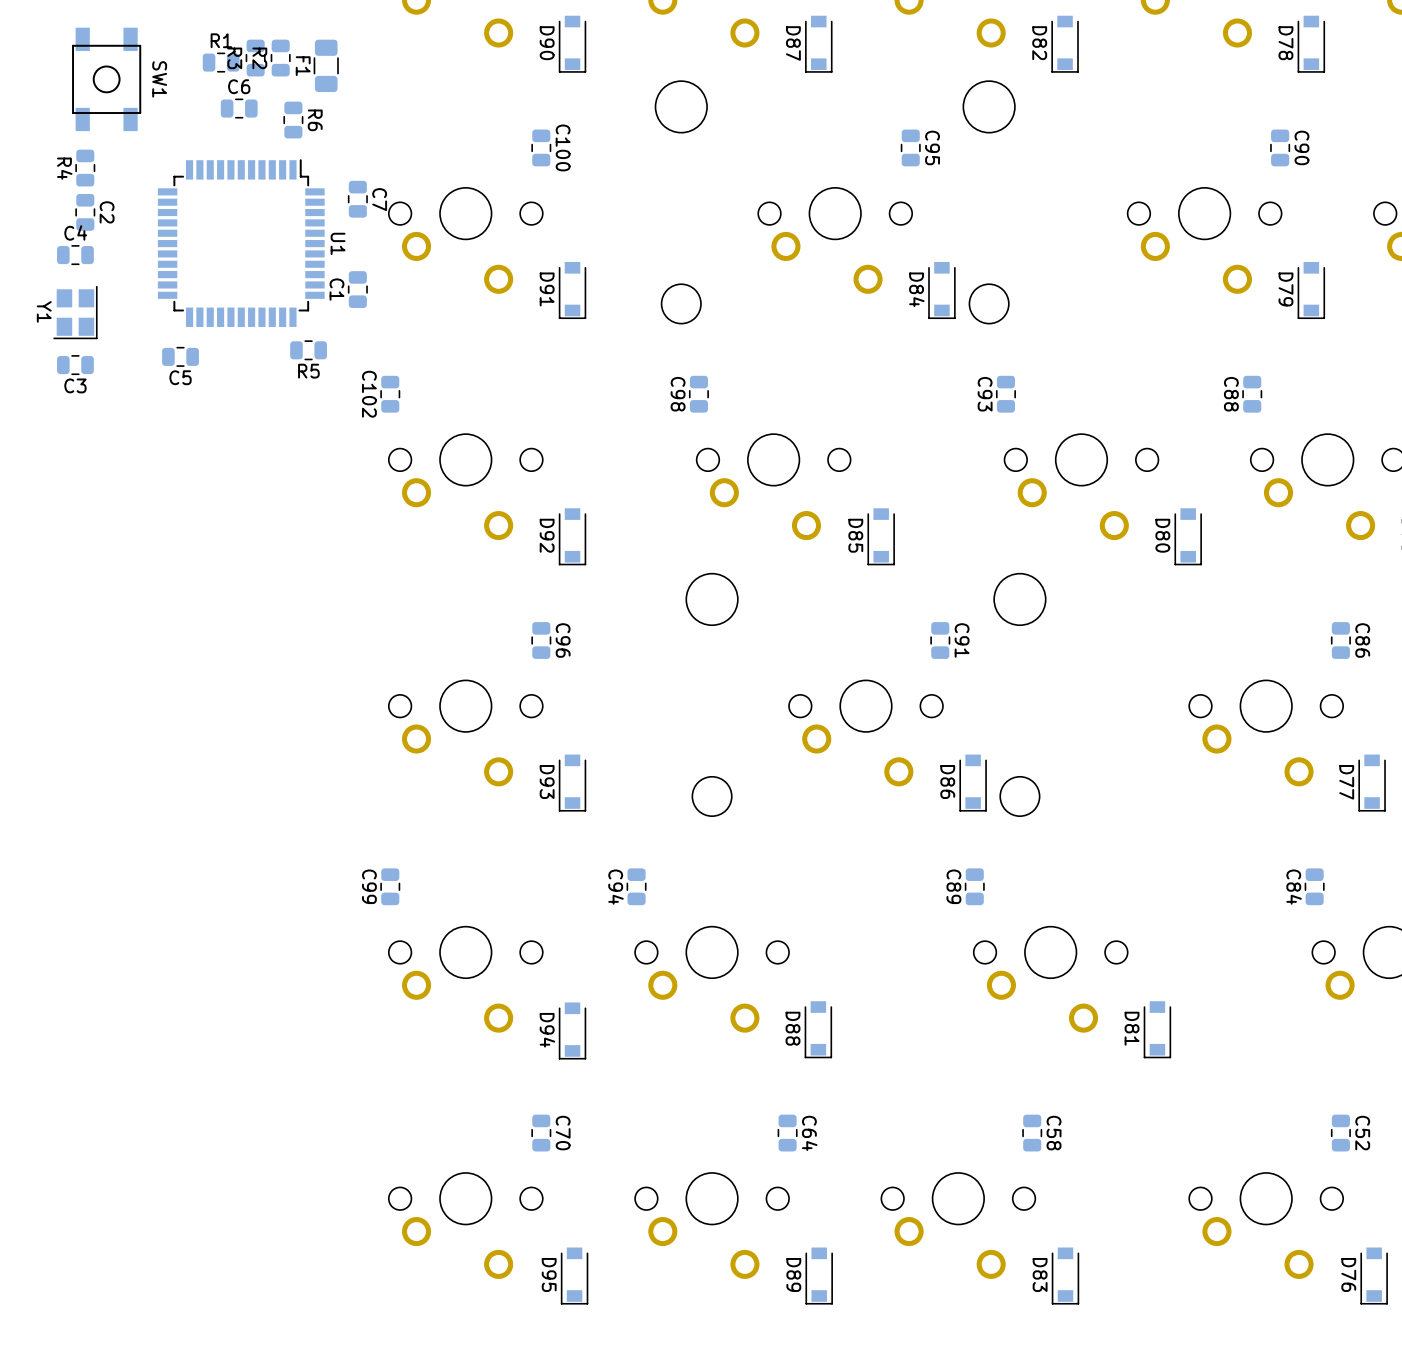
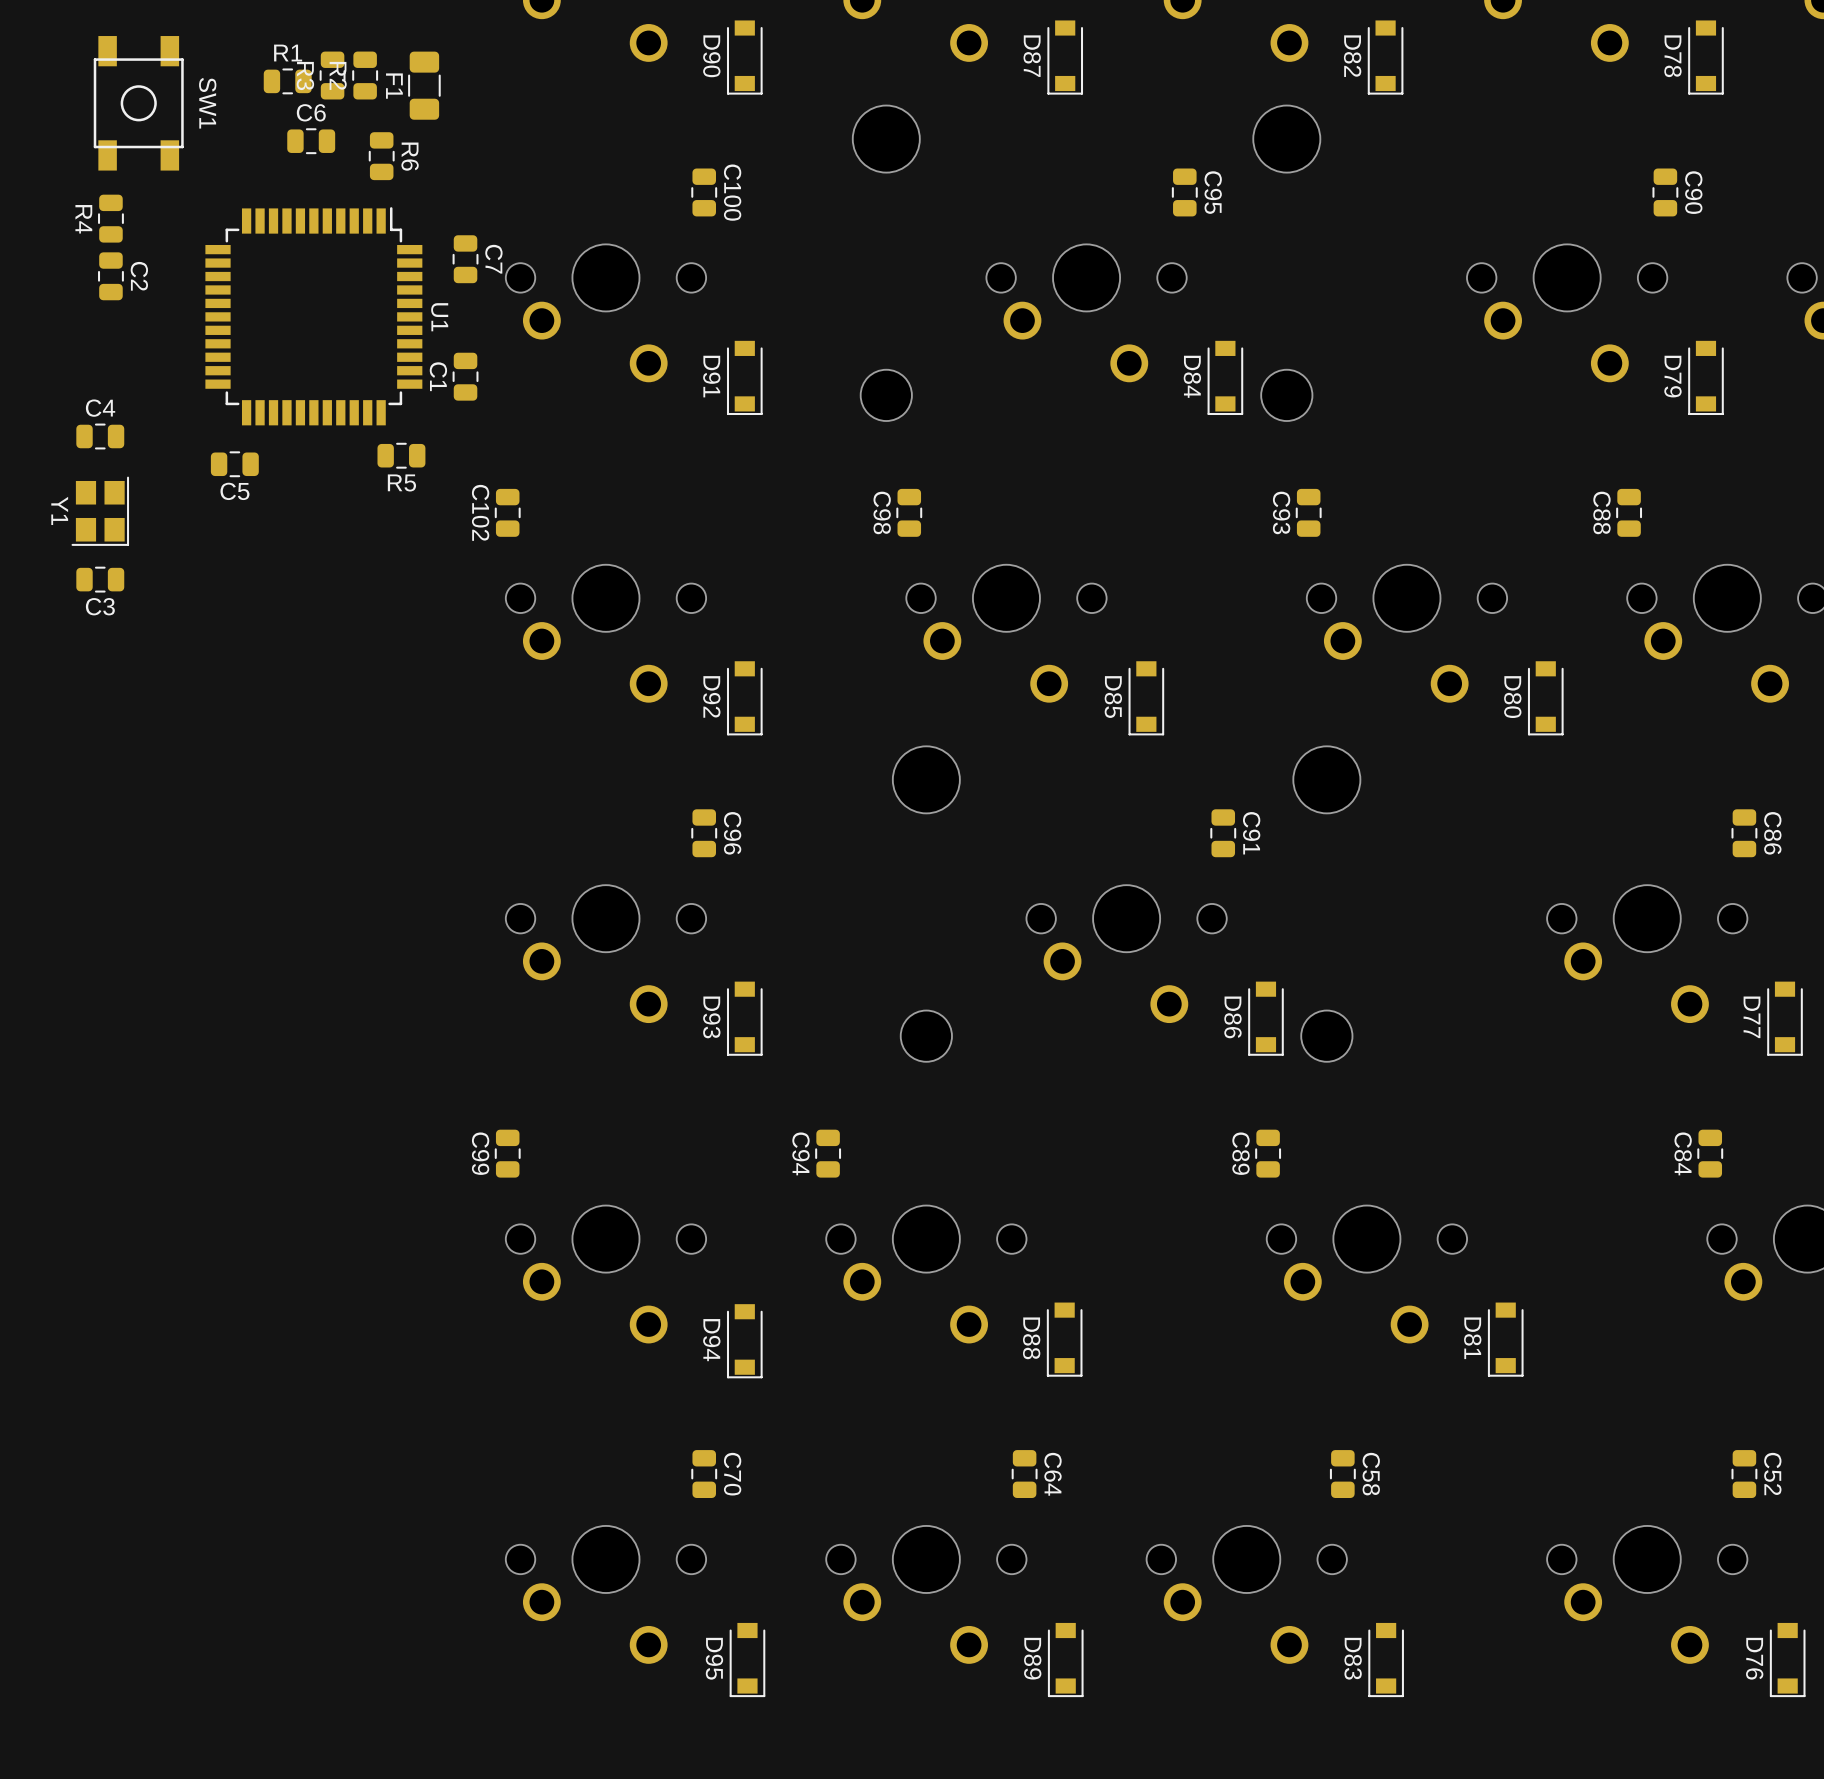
C4 position: (75, 255) -> (100, 436)
Y1 position: (75, 312) -> (100, 511)
C3 position: (75, 365) -> (100, 579)

